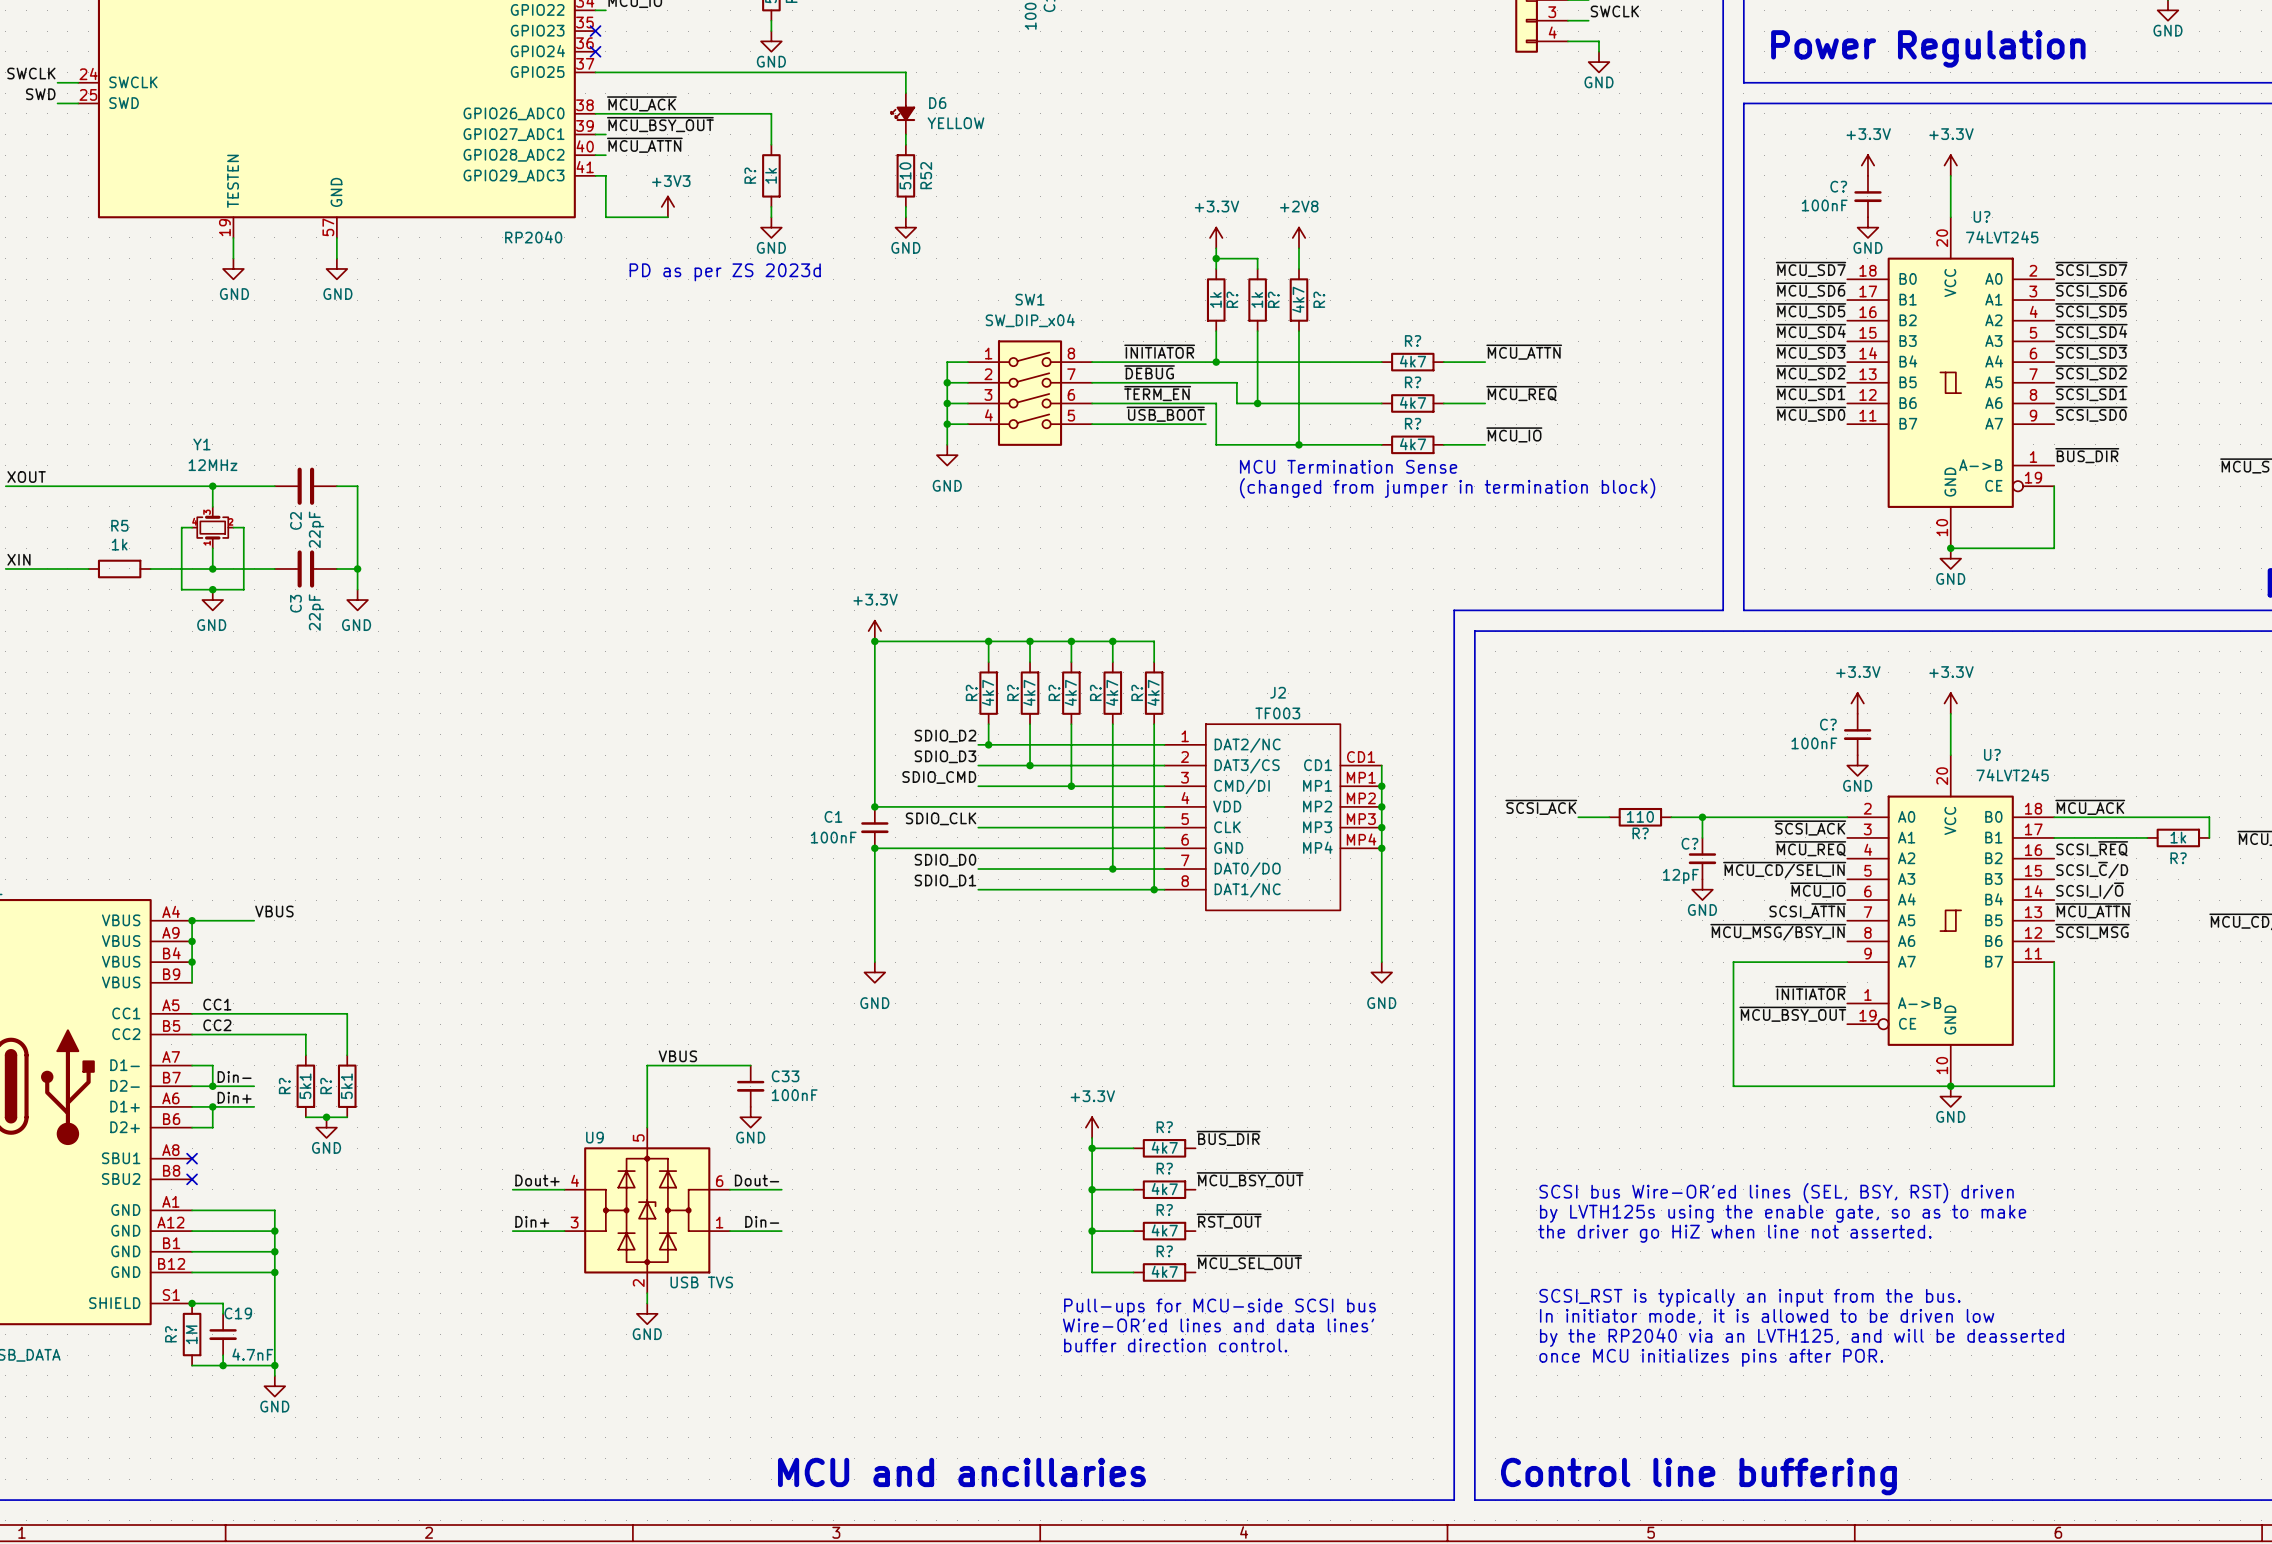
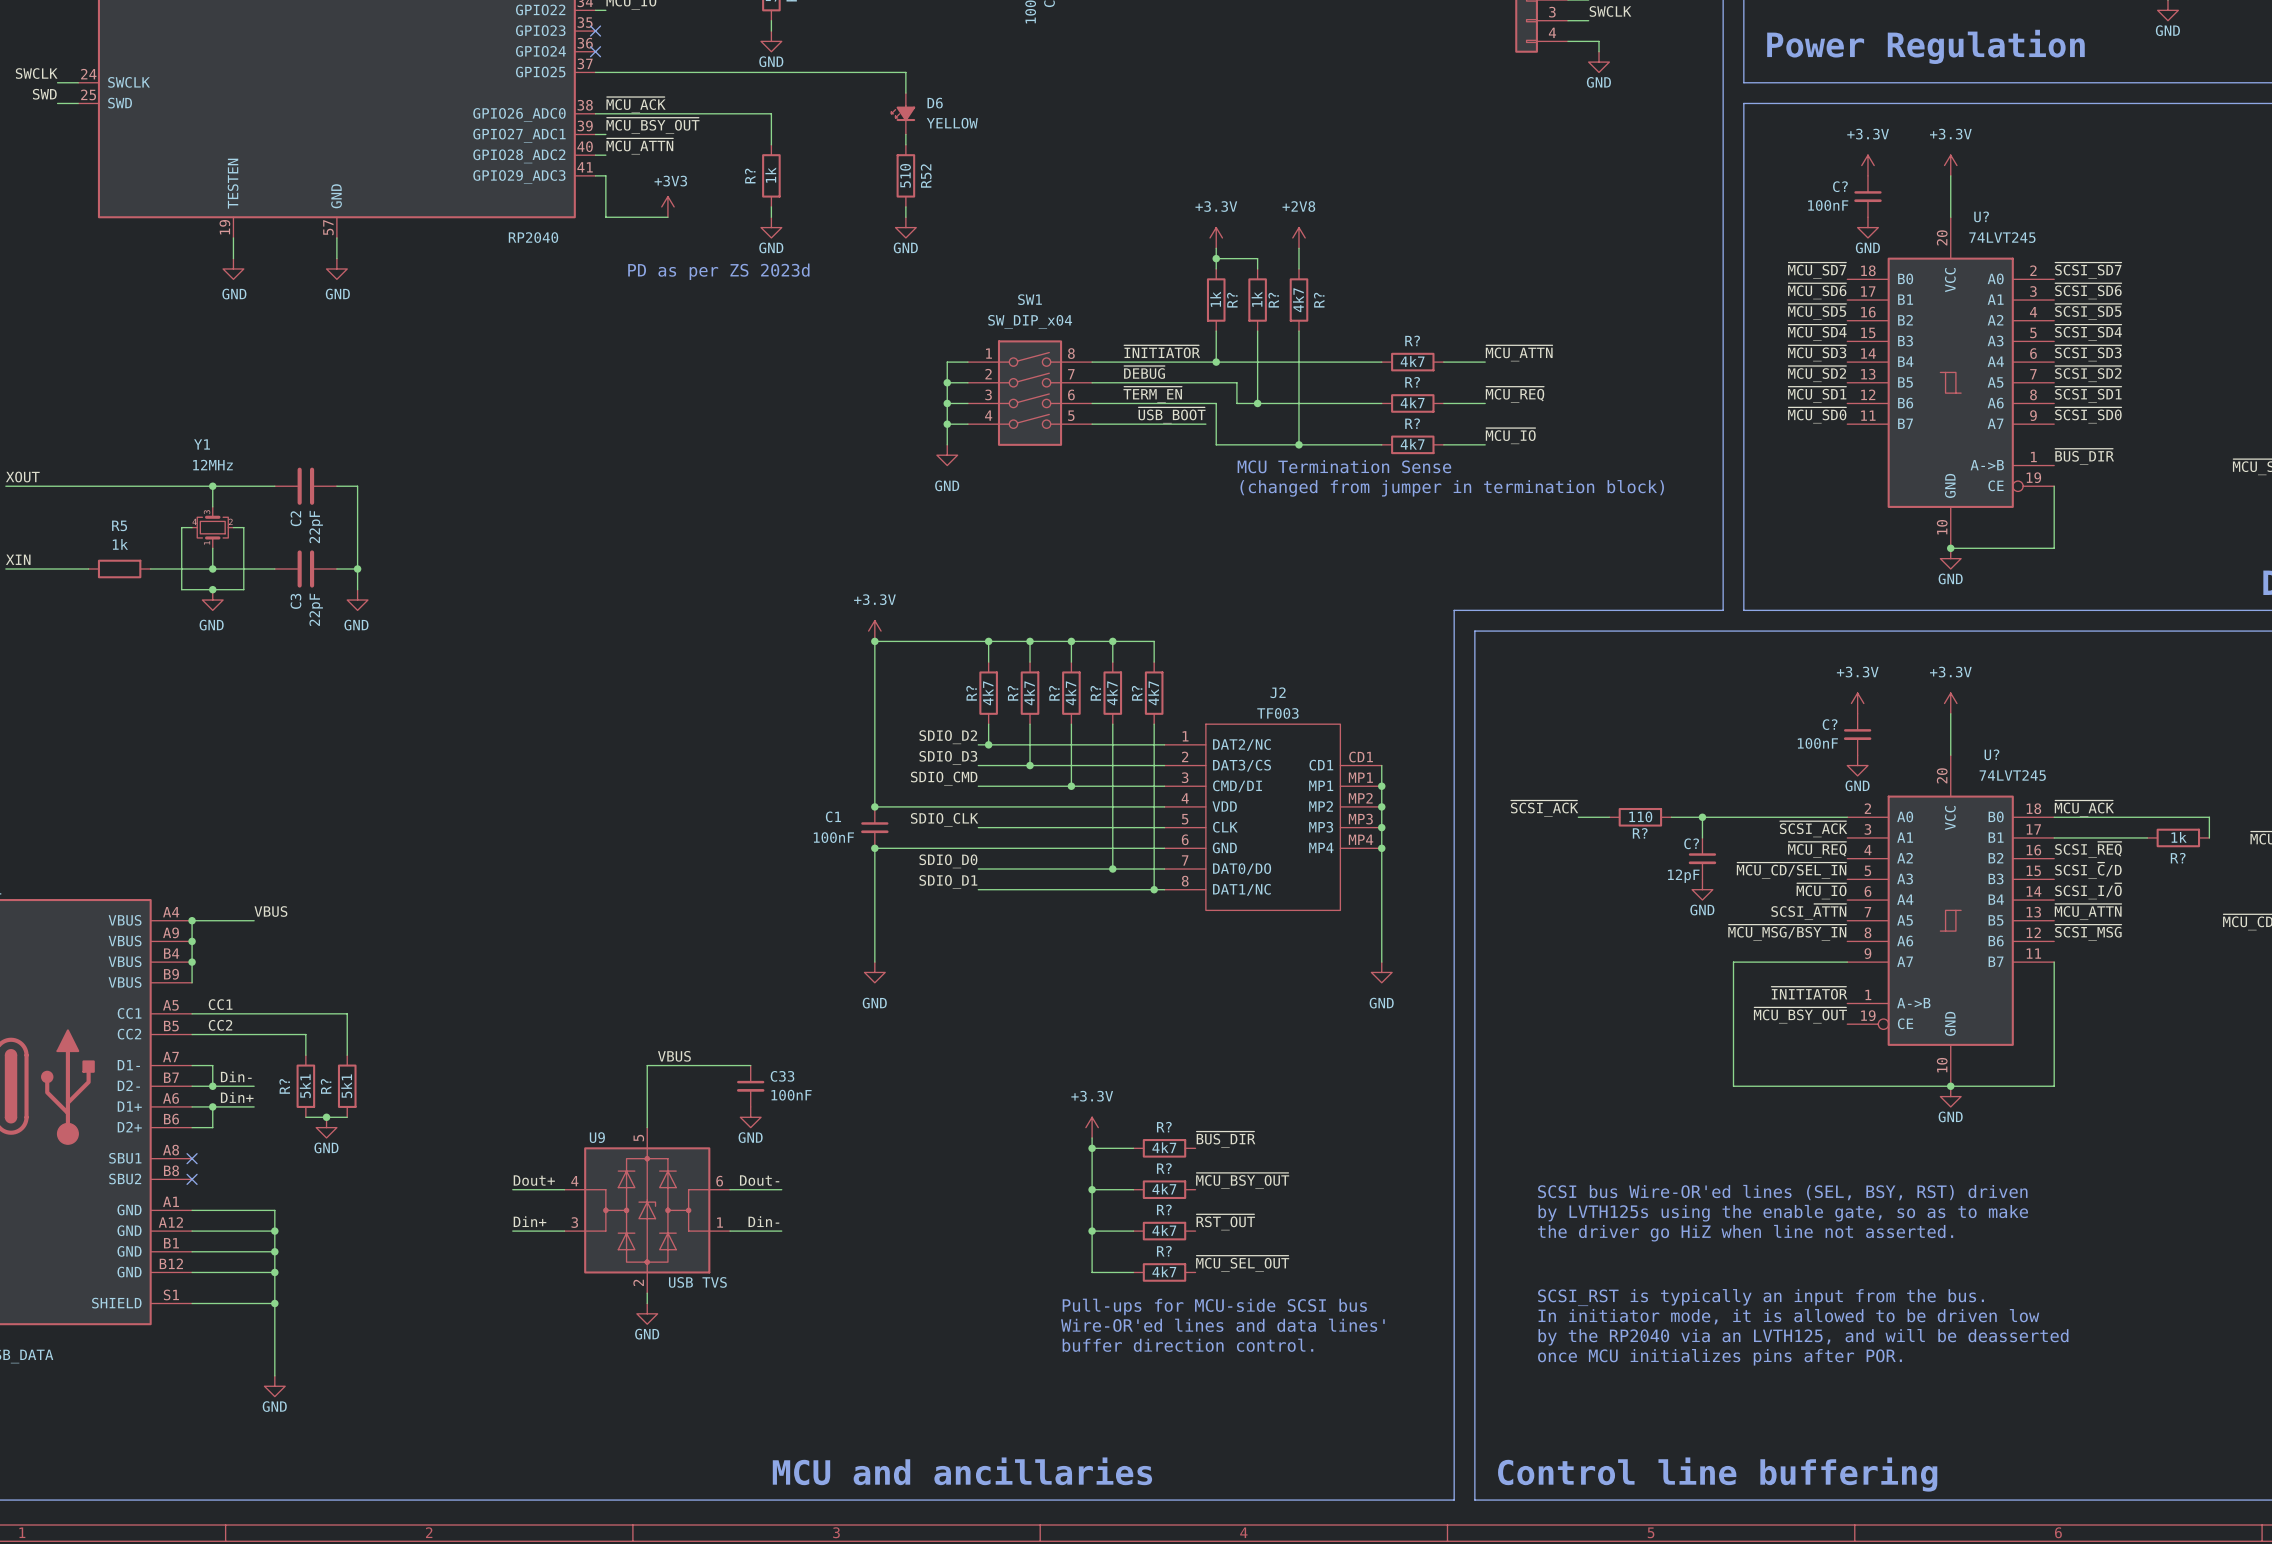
junction: (192, 1303) -> none
wire: (223, 1303) (223, 1313) -> (223, 1303) (274, 1303)
junction: none -> (274, 1303)
R?: 1M (192, 1334) -> none
C19: 4.7nF (223, 1334) -> none
wire: (223, 1355) (223, 1365) -> none
wire: (192, 1365) (274, 1365) -> none
junction: (223, 1365) -> none
junction: (274, 1365) -> none

